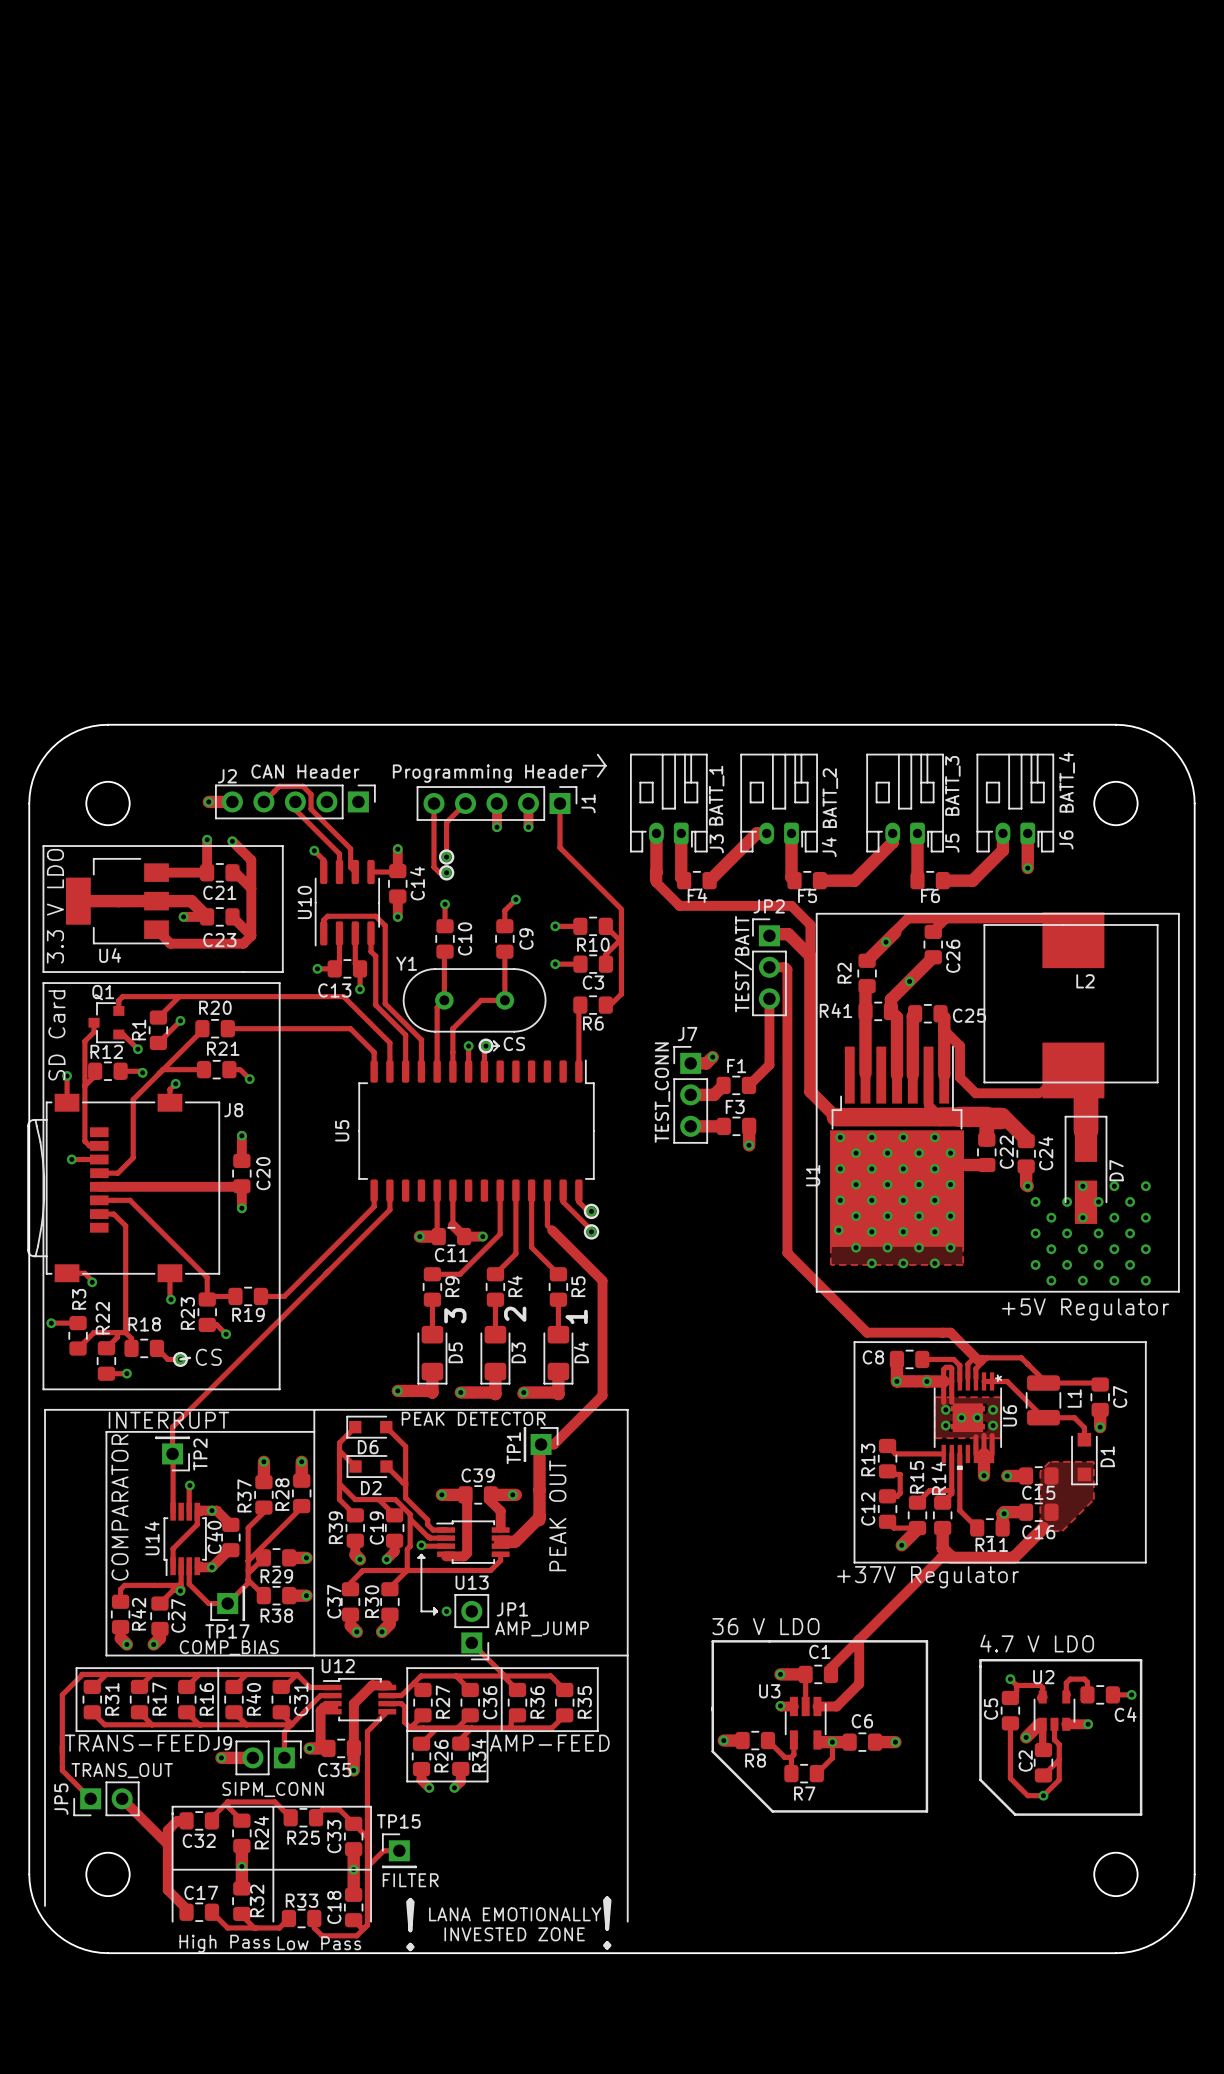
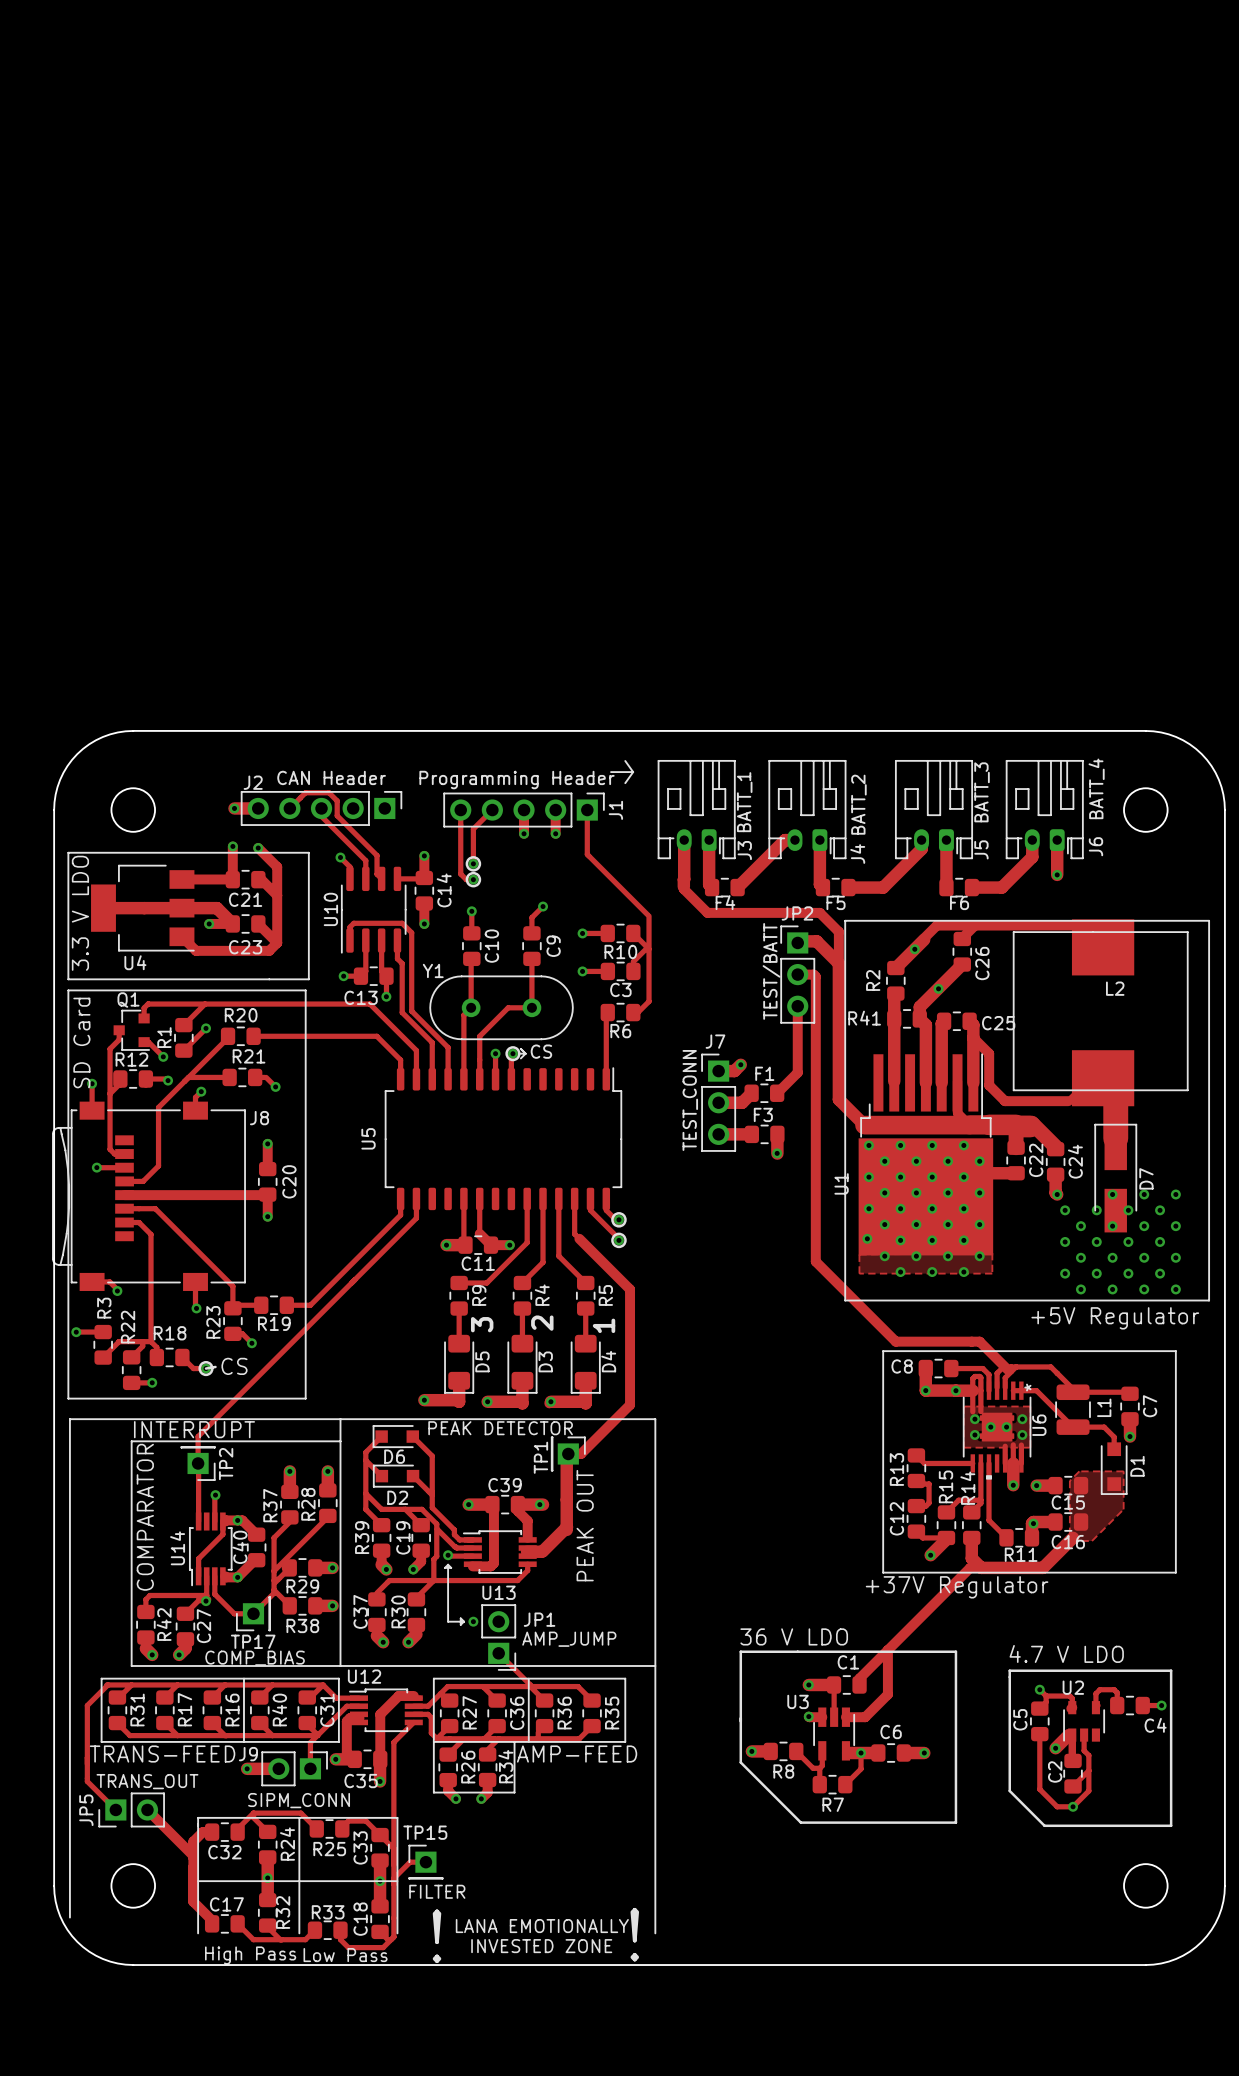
track: (1066, 1724) (1088, 1724) -> none
via: (1088, 1724) -> none

